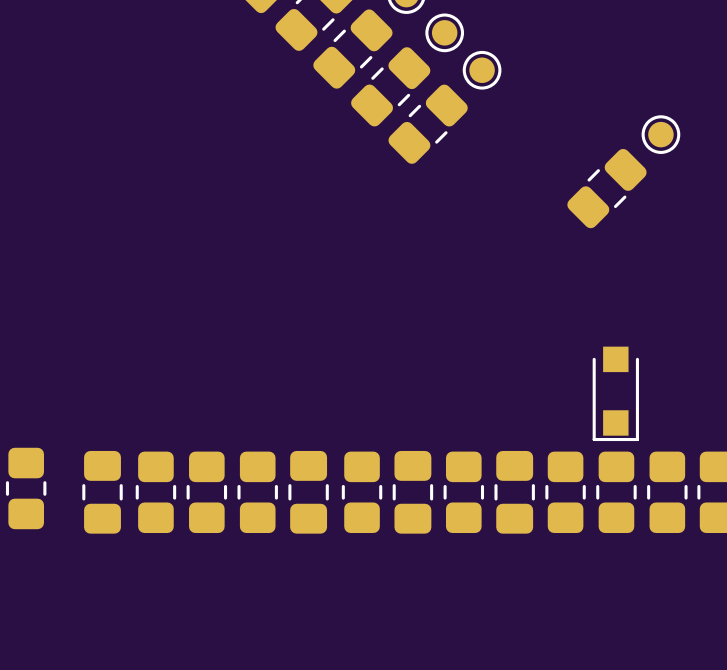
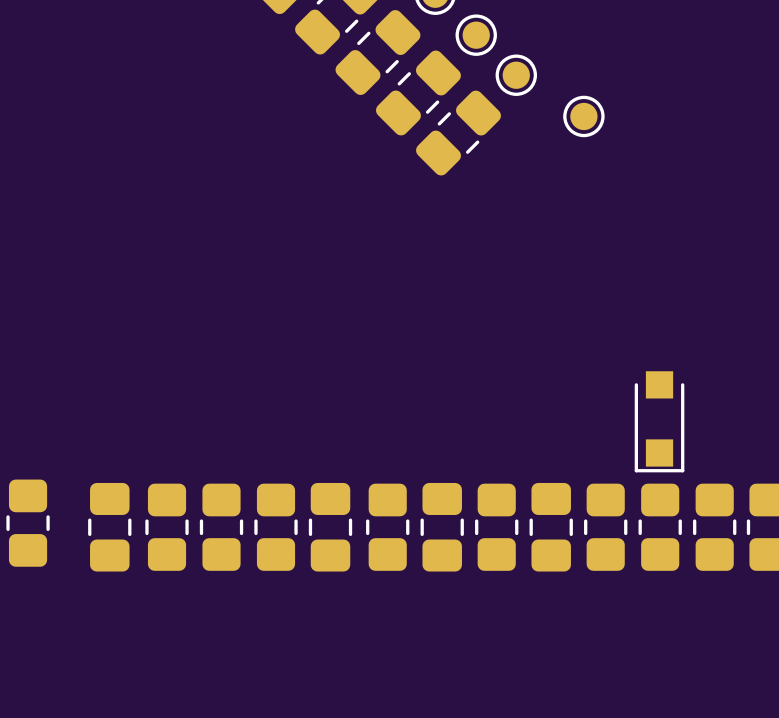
part position: (660, 134) -> (583, 116)
part: (606, 188) -> none

